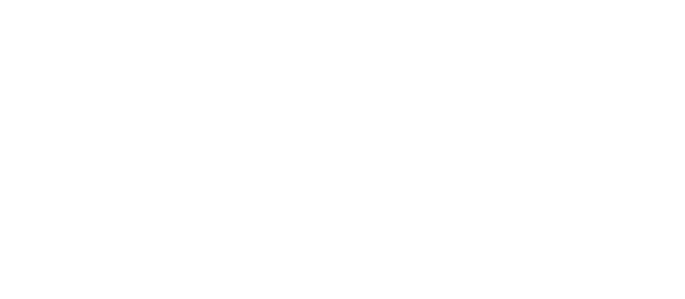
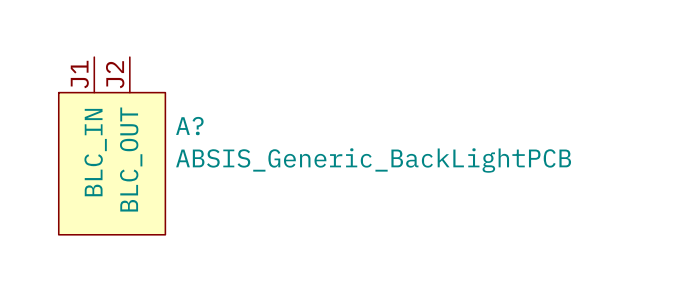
A?: none -> ABSIS_Generic_BackLightPCB (112, 145)

